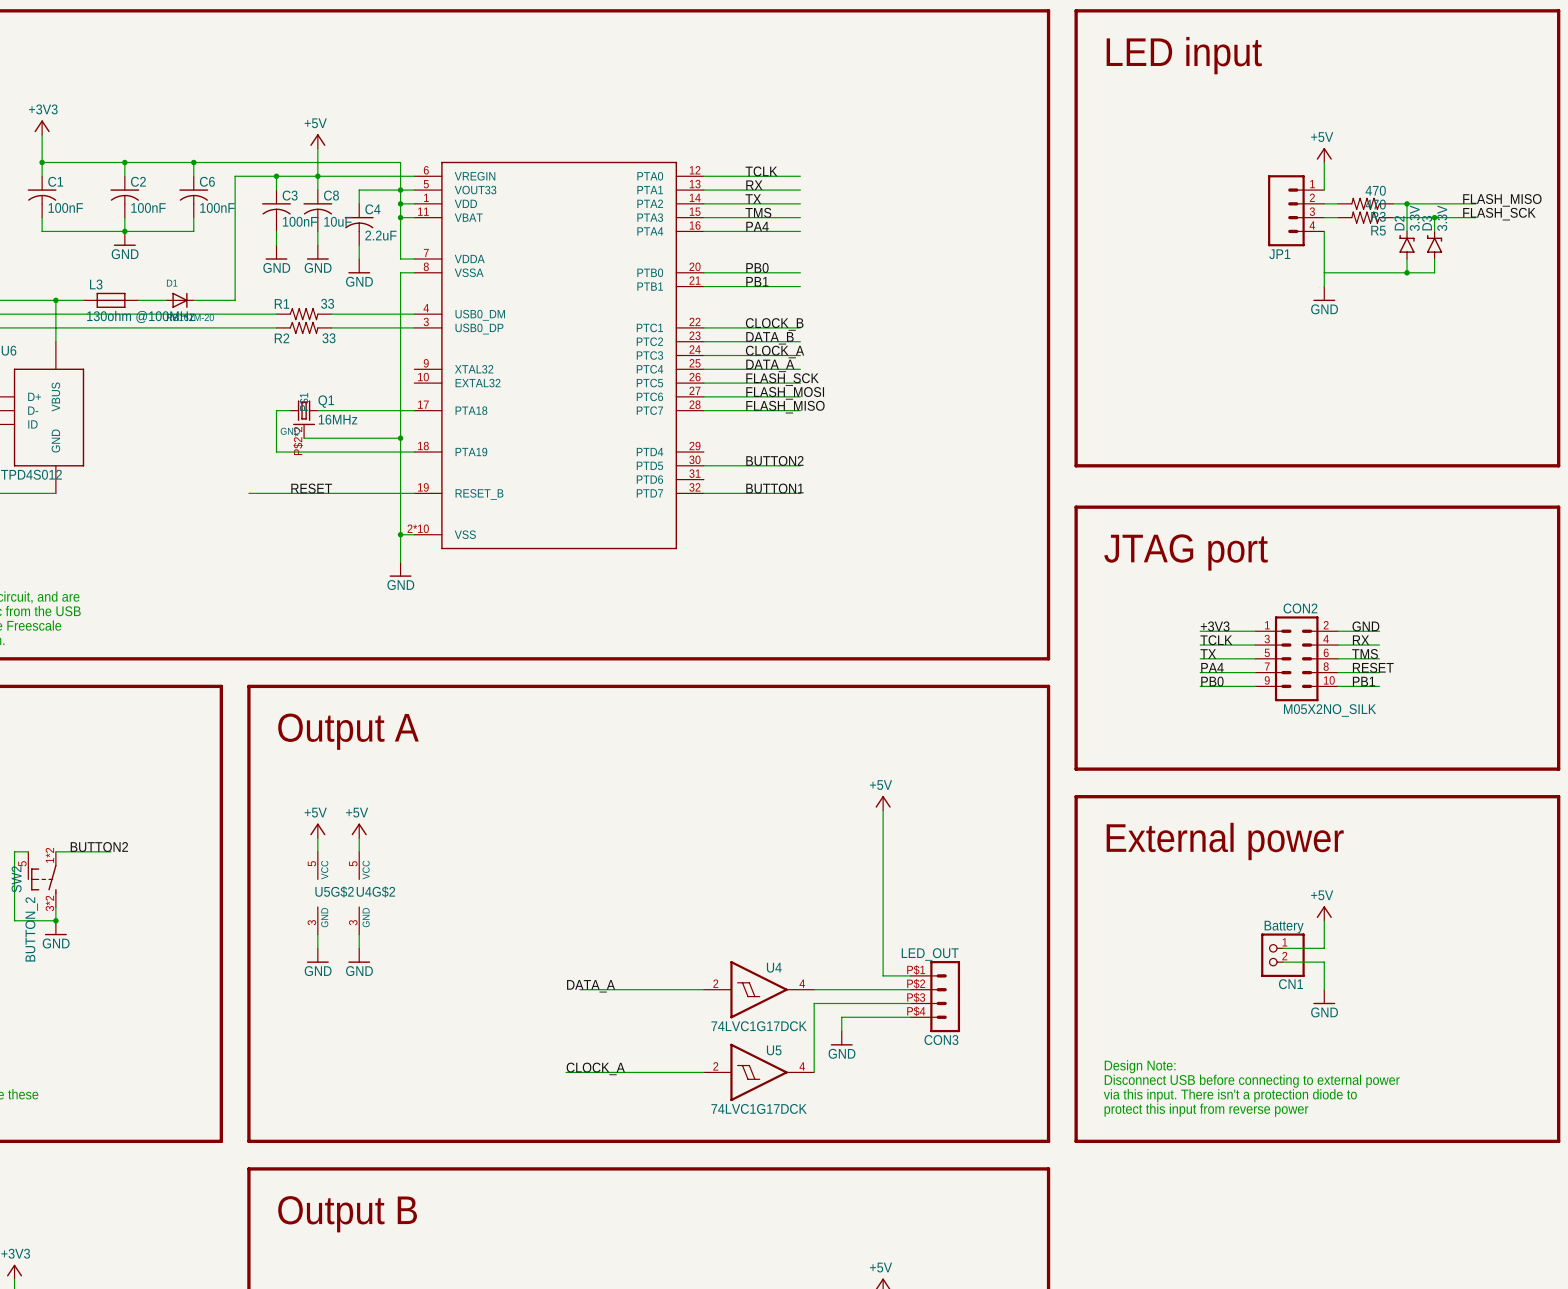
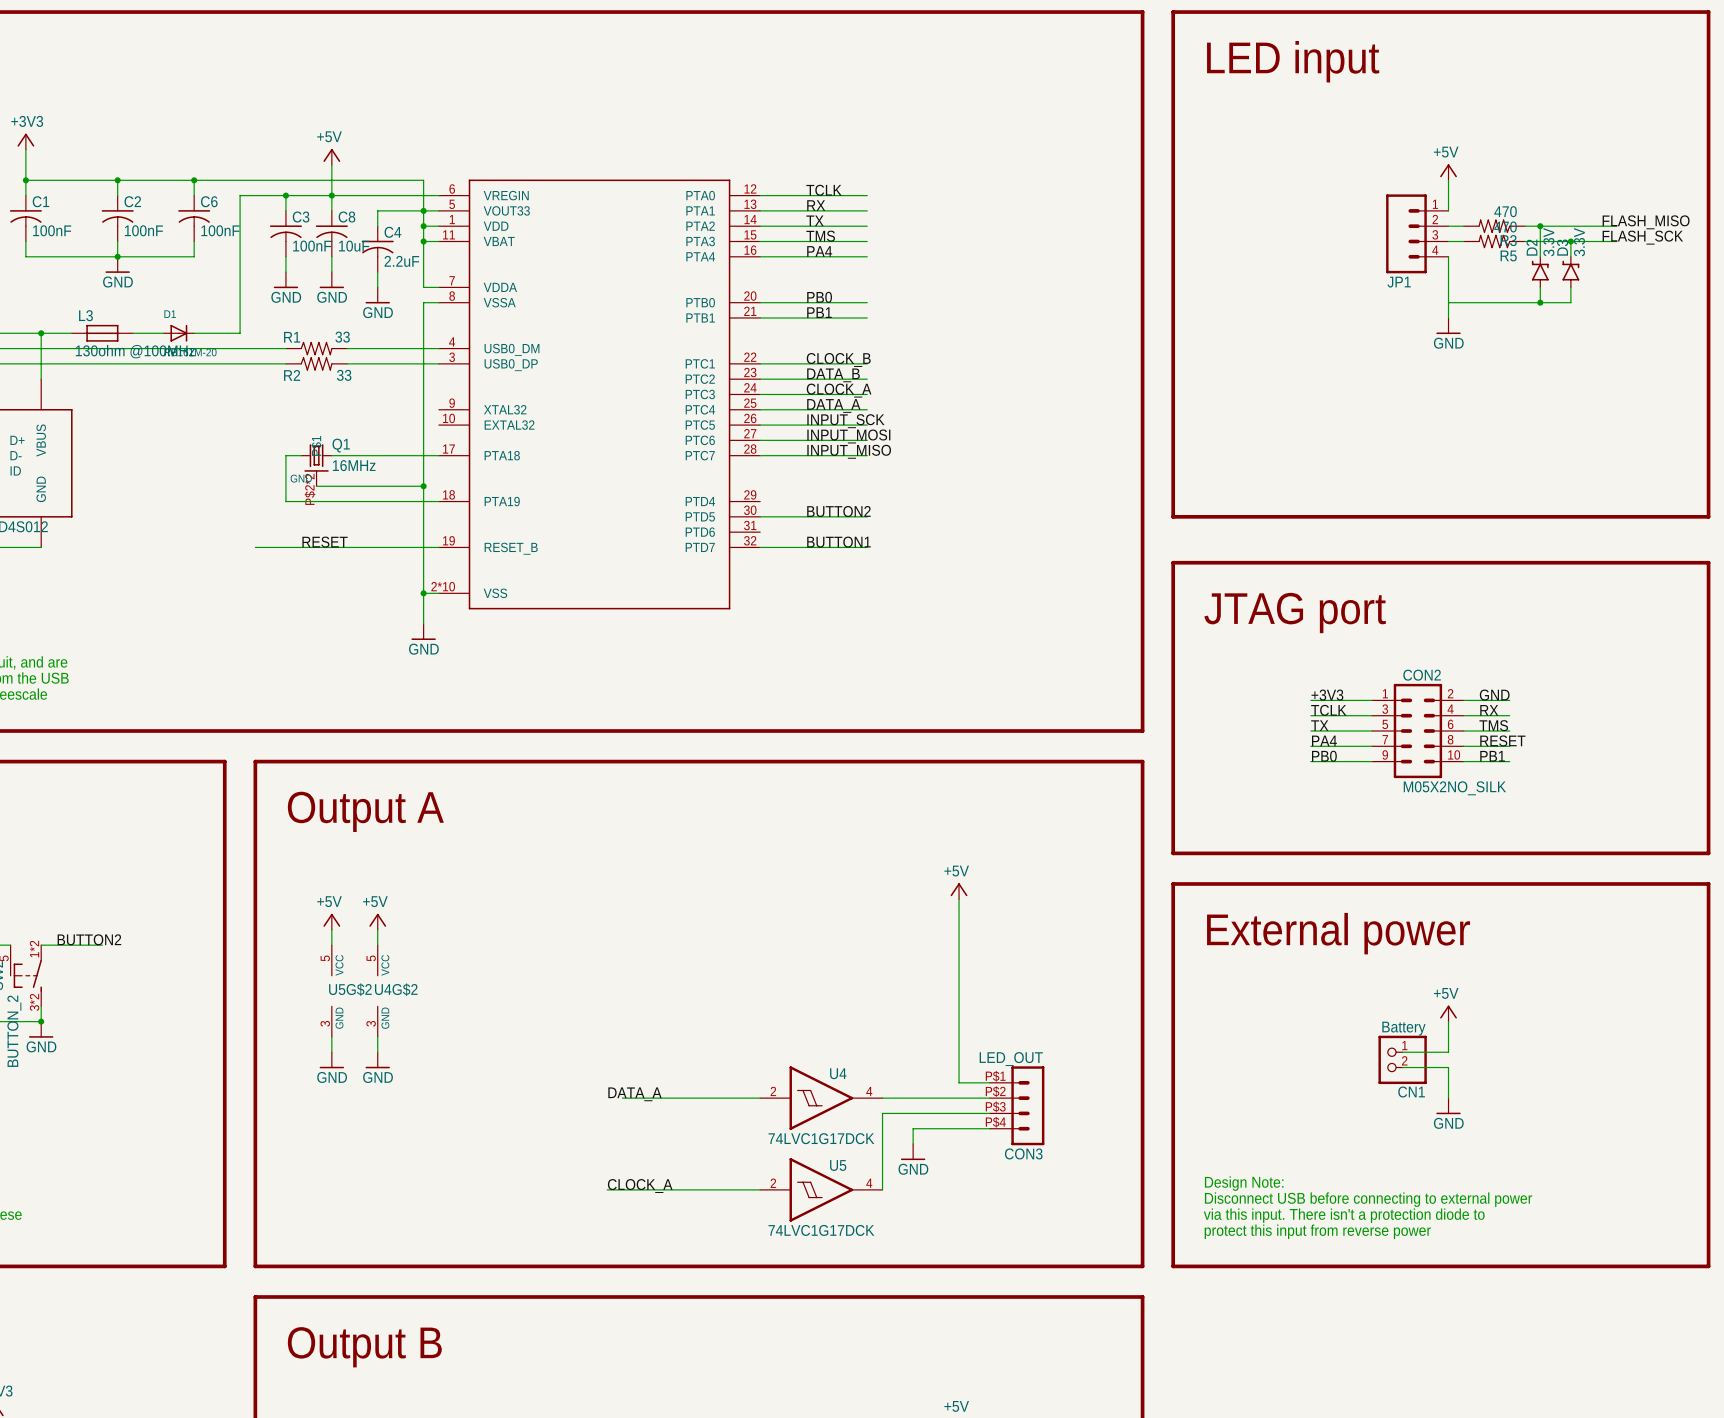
label: FLASH_SCK (782, 379) -> INPUT_SCK (845, 421)
label: FLASH_MOSI (785, 393) -> INPUT_MOSI (848, 436)
label: FLASH_MISO (785, 407) -> INPUT_MISO (849, 451)

